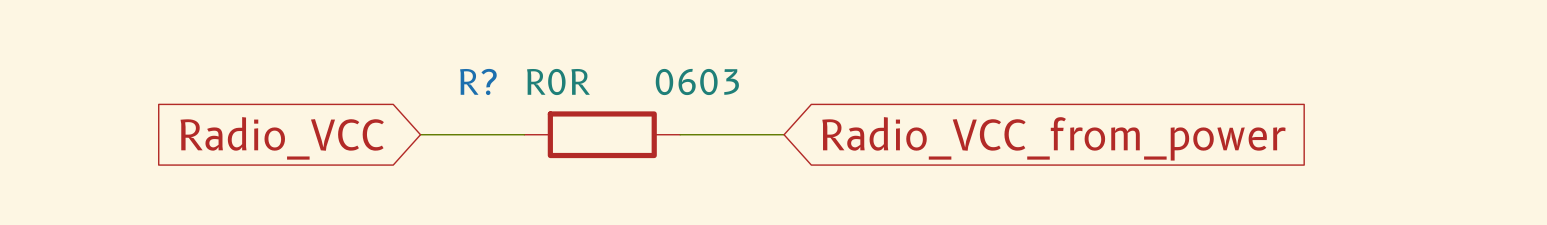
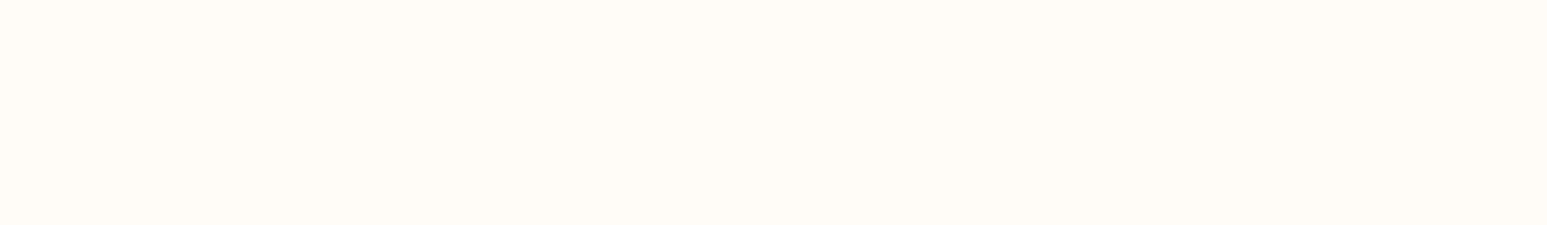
wire: (420, 134) (524, 134) -> none
R?: R0R (602, 134) -> none
wire: (680, 134) (784, 134) -> none
global label: Radio_VCC (282, 138) -> none
global label: Radio_VCC_from_power (1053, 138) -> none

